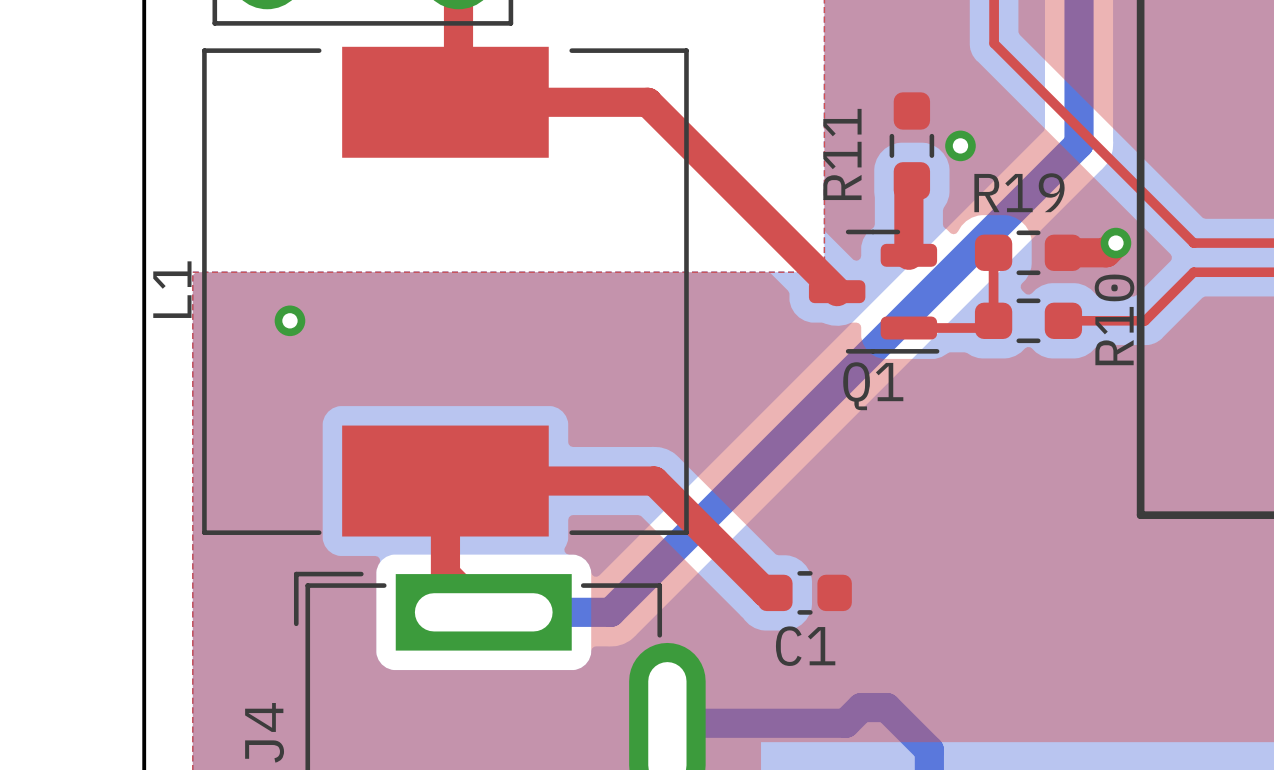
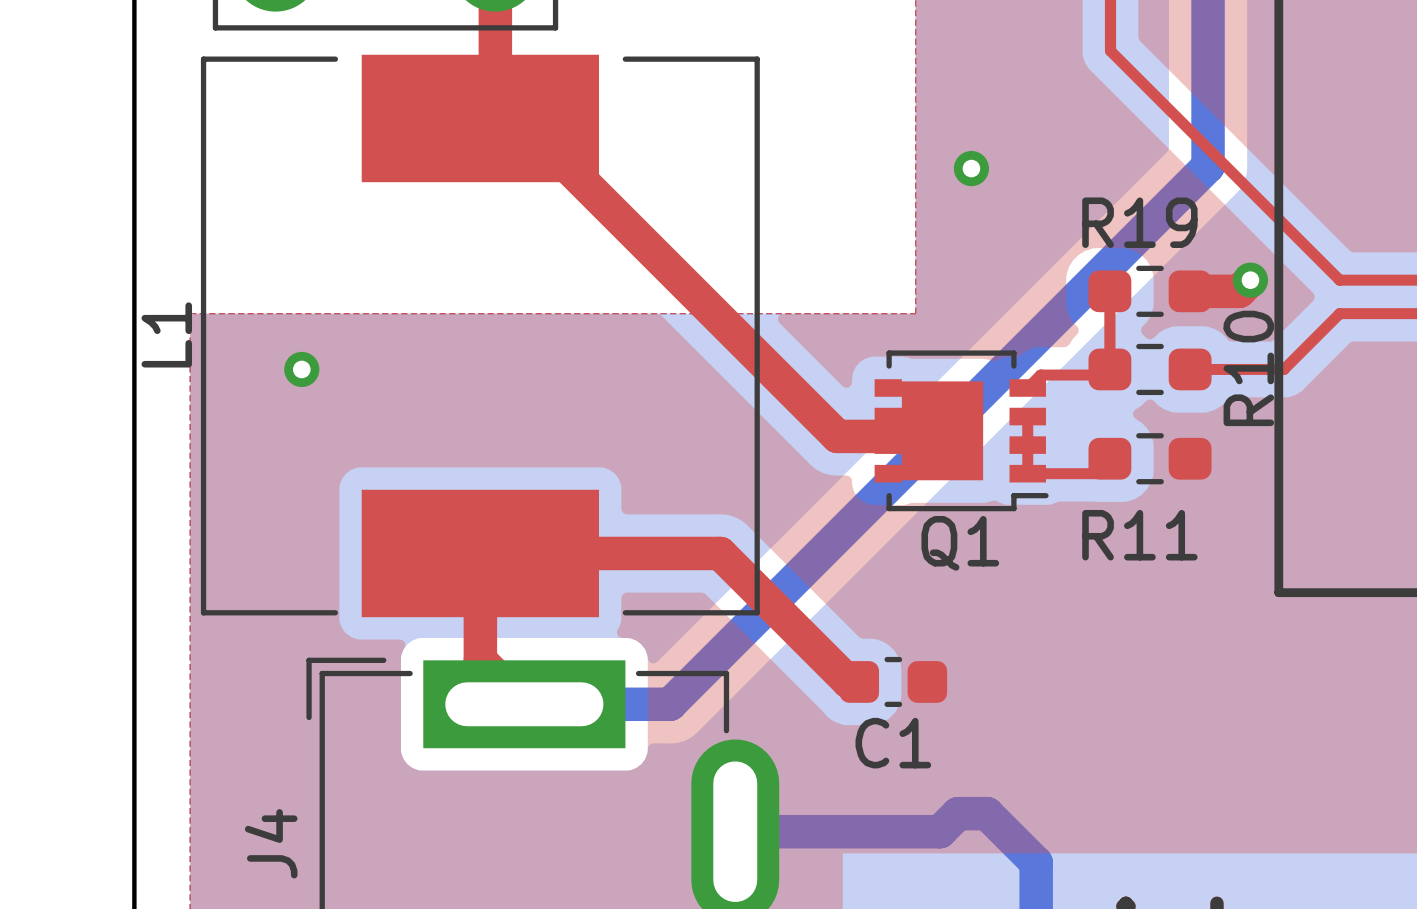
top track: none -> (497, 96) (837, 436) (936, 436) (942, 430)
top track: (445, 102) (647, 102) (837, 291) -> none
R11 rotation: 0° (911, 145) -> 90° clockwise (1150, 458)
R11 position: (911, 145) -> (1150, 458)
via position: (960, 145) -> (971, 168)
R11 name position: R11 (842, 154) -> R11 (1139, 535)
top track: (911, 180) (908, 183) (908, 255) -> none
Q1 footprint: [808, 229, 940, 354] -> [874, 350, 1049, 512]
top track: (993, 320) (986, 328) (908, 328) -> none
top track: none -> (1104, 375) (1040, 375) (1027, 388)
top track: none -> (1027, 416) (1027, 473) (1094, 473) (1109, 458)

